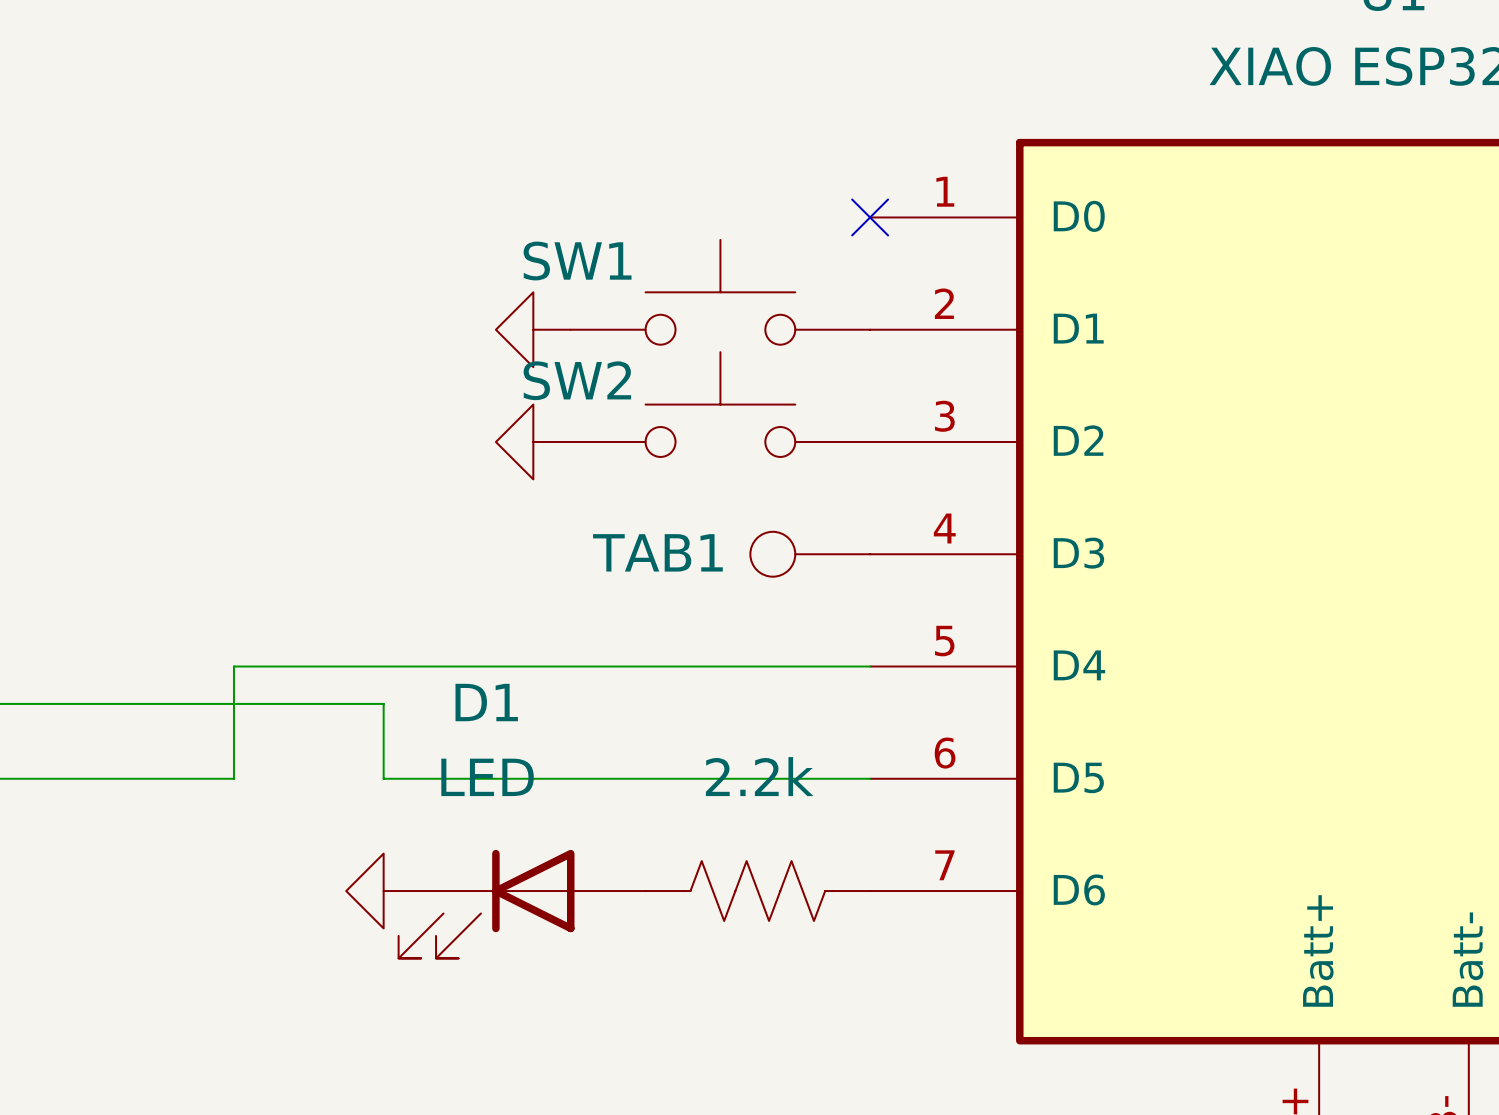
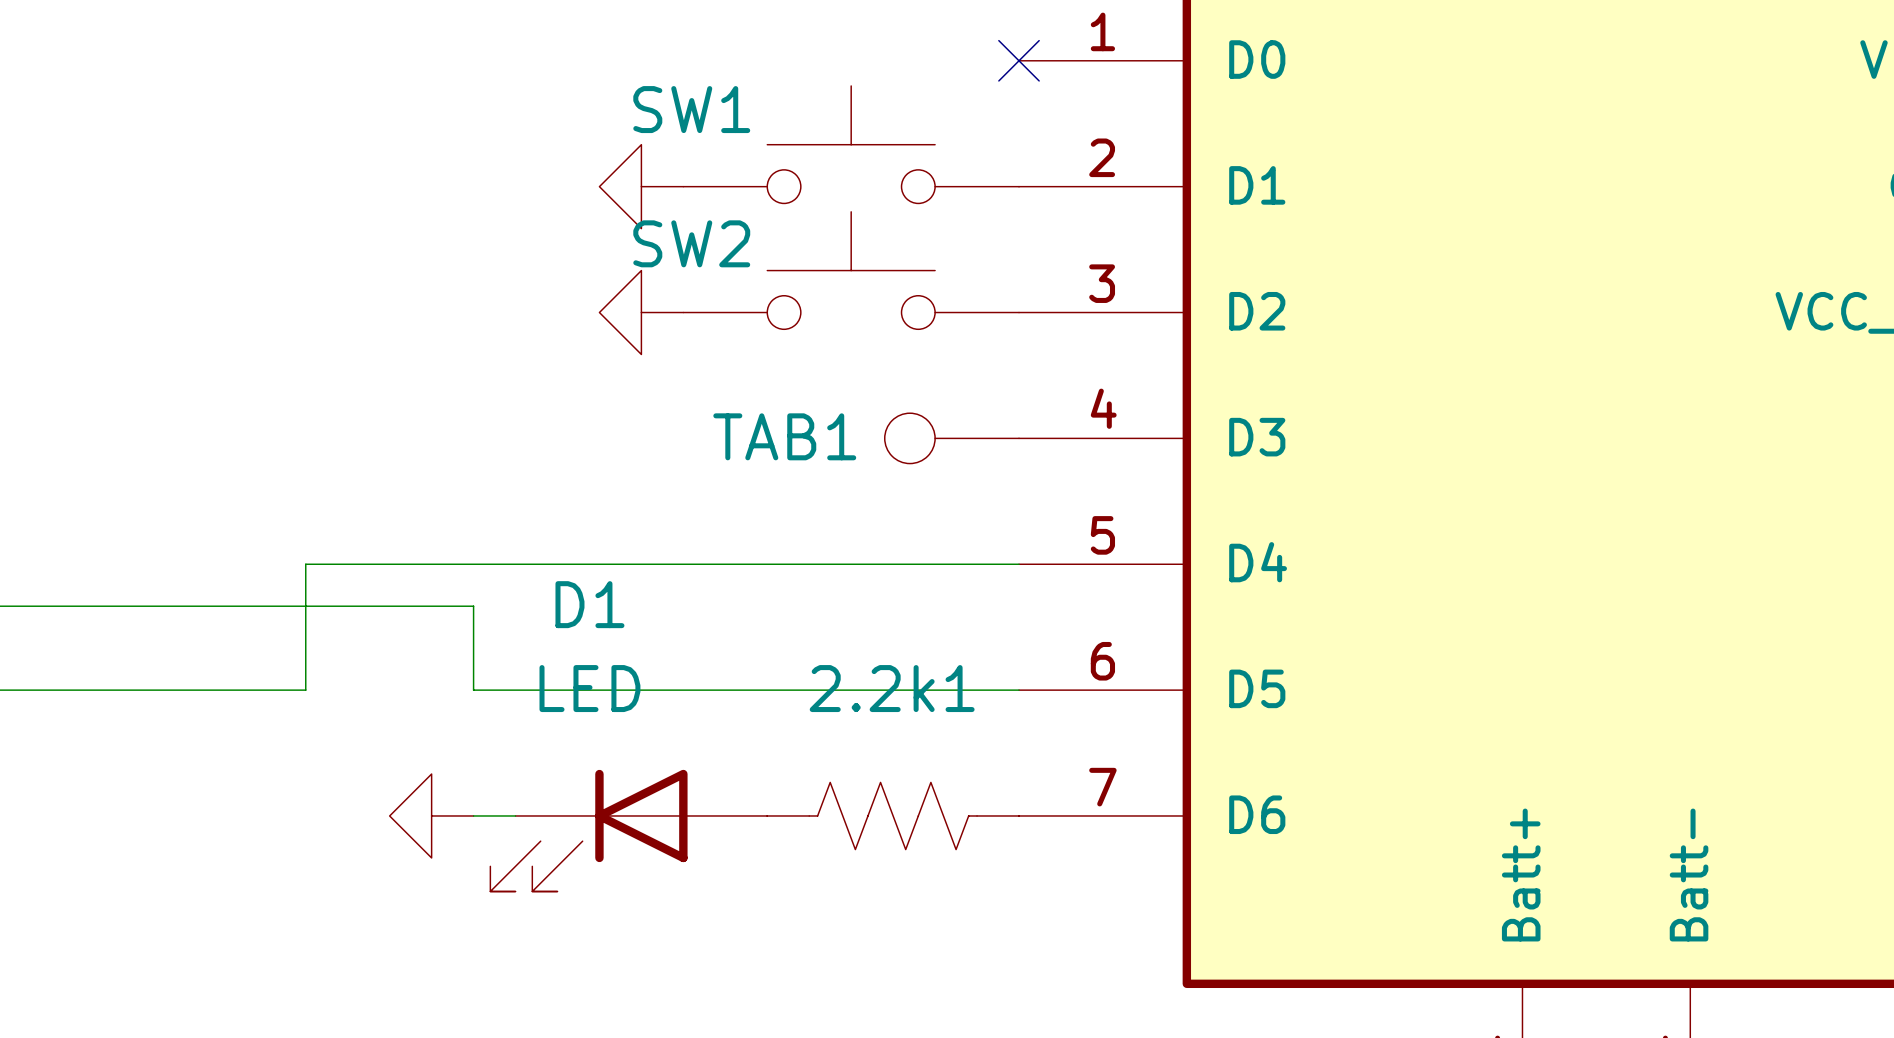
2.2k name: 2.2k (759, 776) -> 2.2k1 (892, 688)
power symbol position: (383, 891) -> (431, 815)

